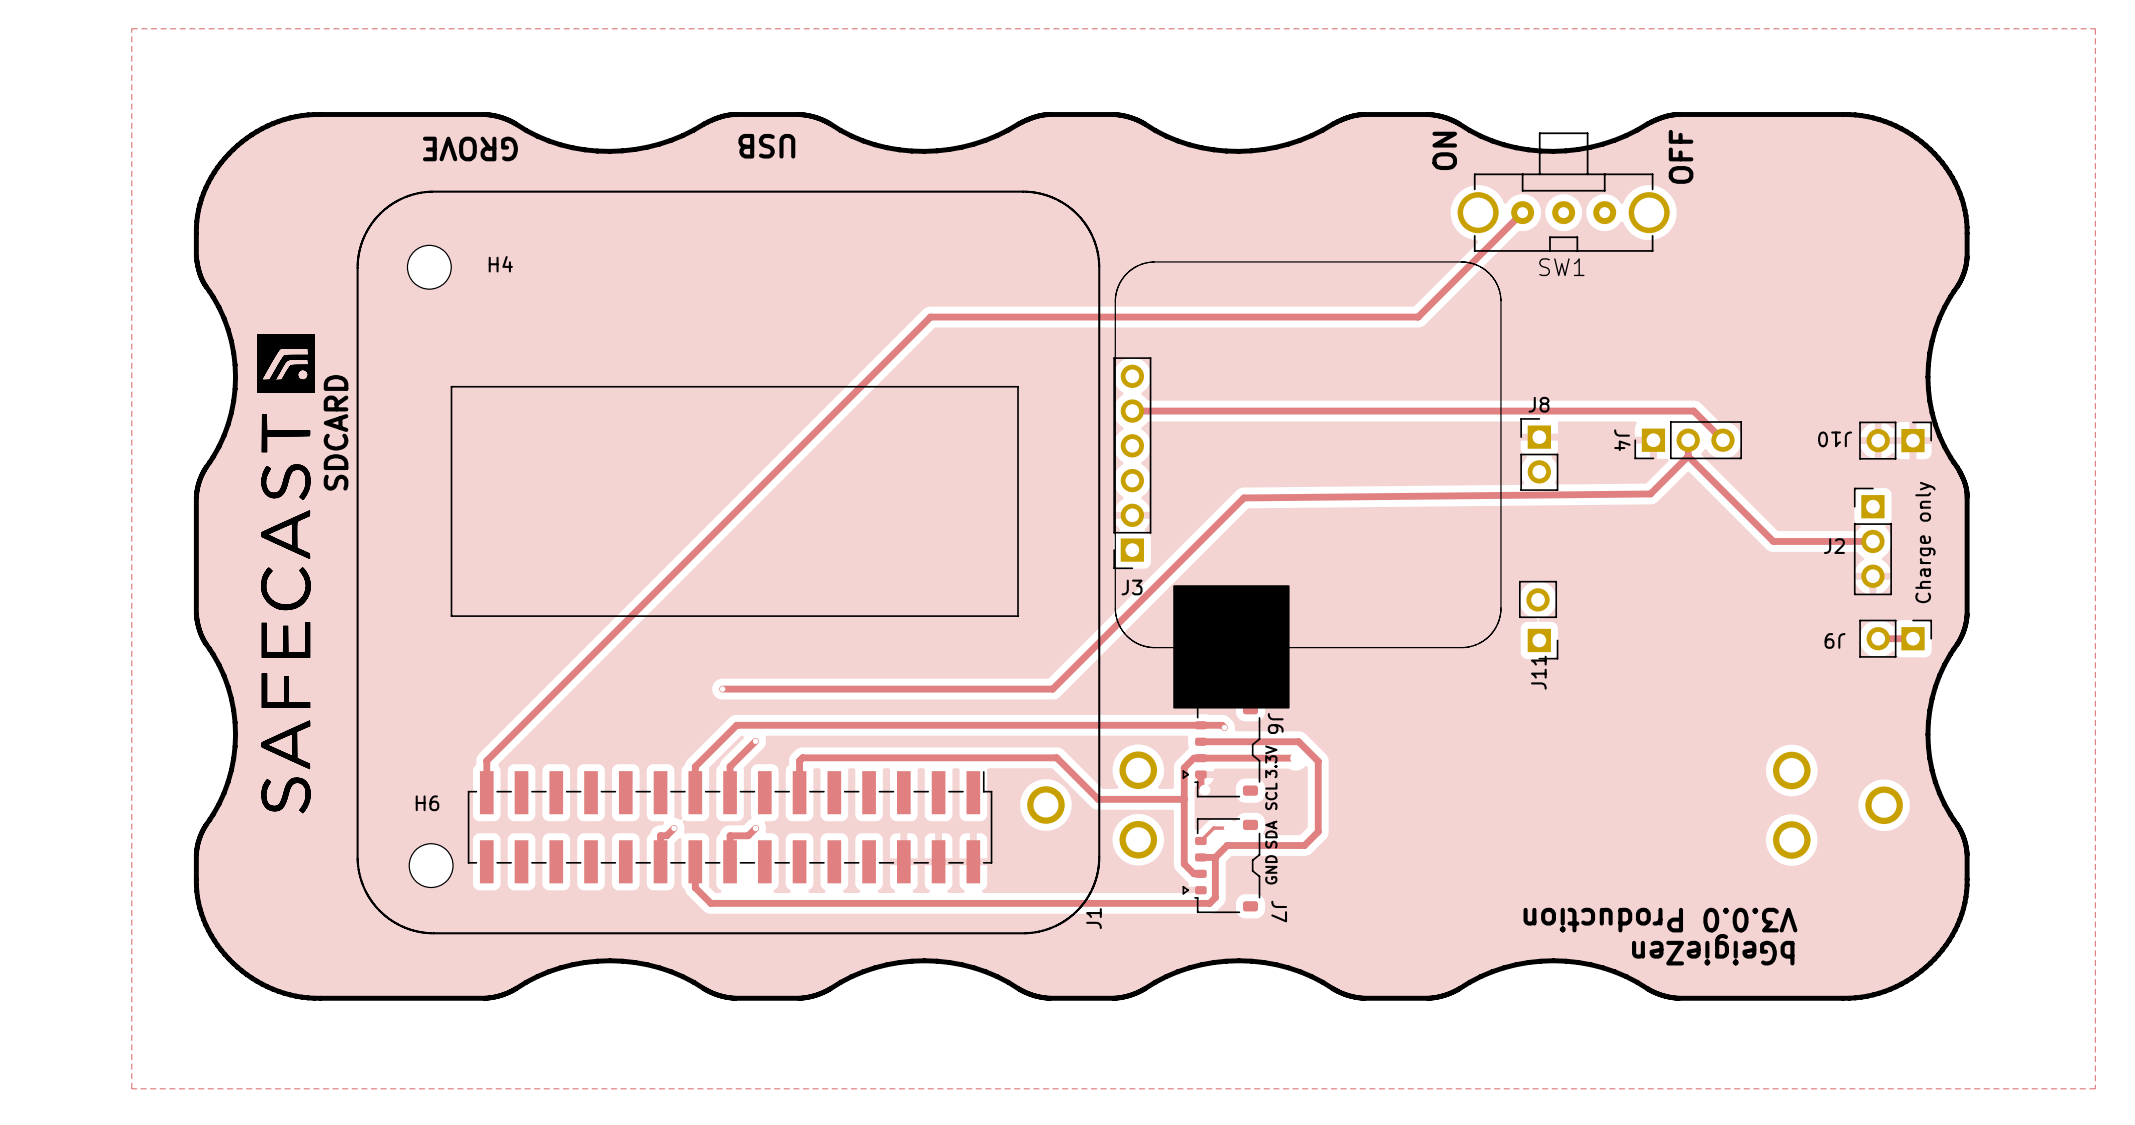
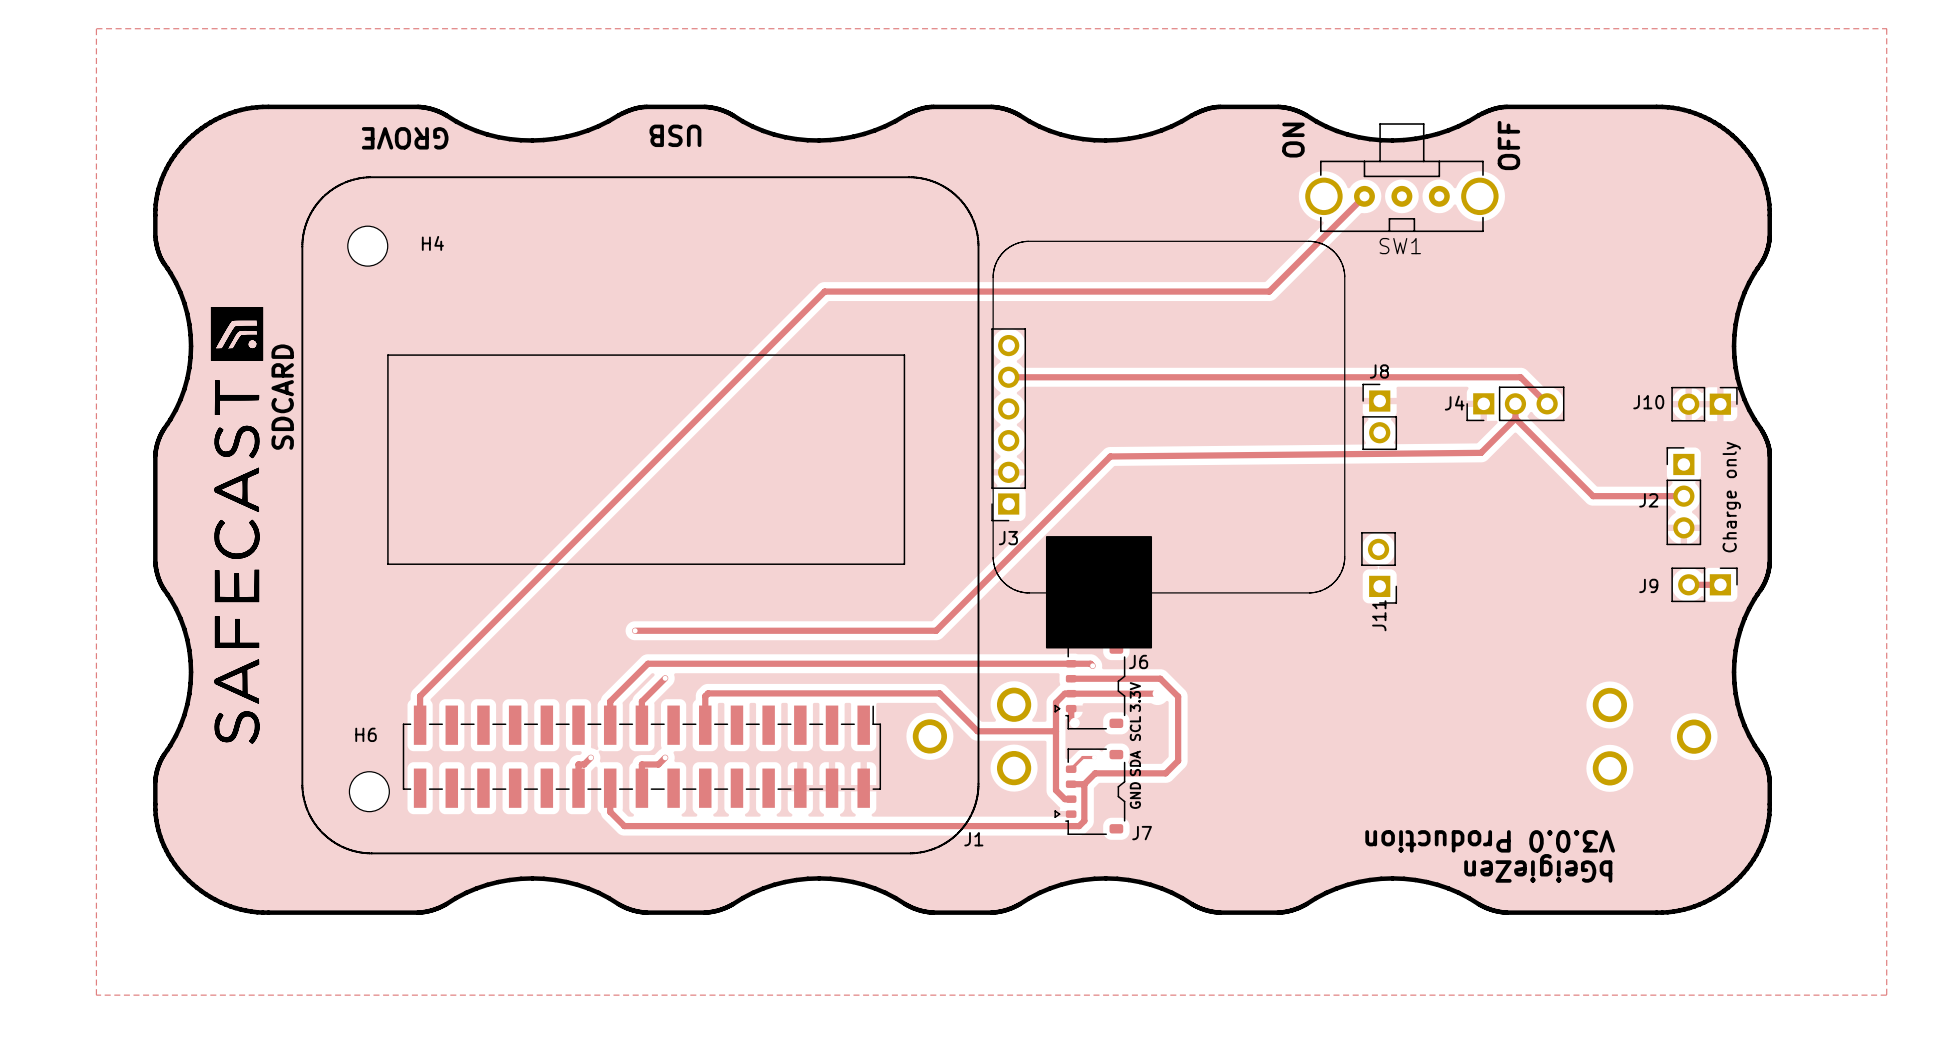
J10 name rotation: 0° (1835, 439) -> 180° (1648, 402)
J4 name rotation: 0° (1622, 440) -> 90° counterclockwise (1454, 403)
J9 name rotation: 0° (1835, 640) -> 180° (1648, 585)
J6 name rotation: 0° (1275, 723) -> 90° counterclockwise (1138, 661)
J7 name rotation: 0° (1279, 911) -> 90° counterclockwise (1142, 833)
J1 name rotation: 0° (1093, 918) -> 90° clockwise (973, 839)

